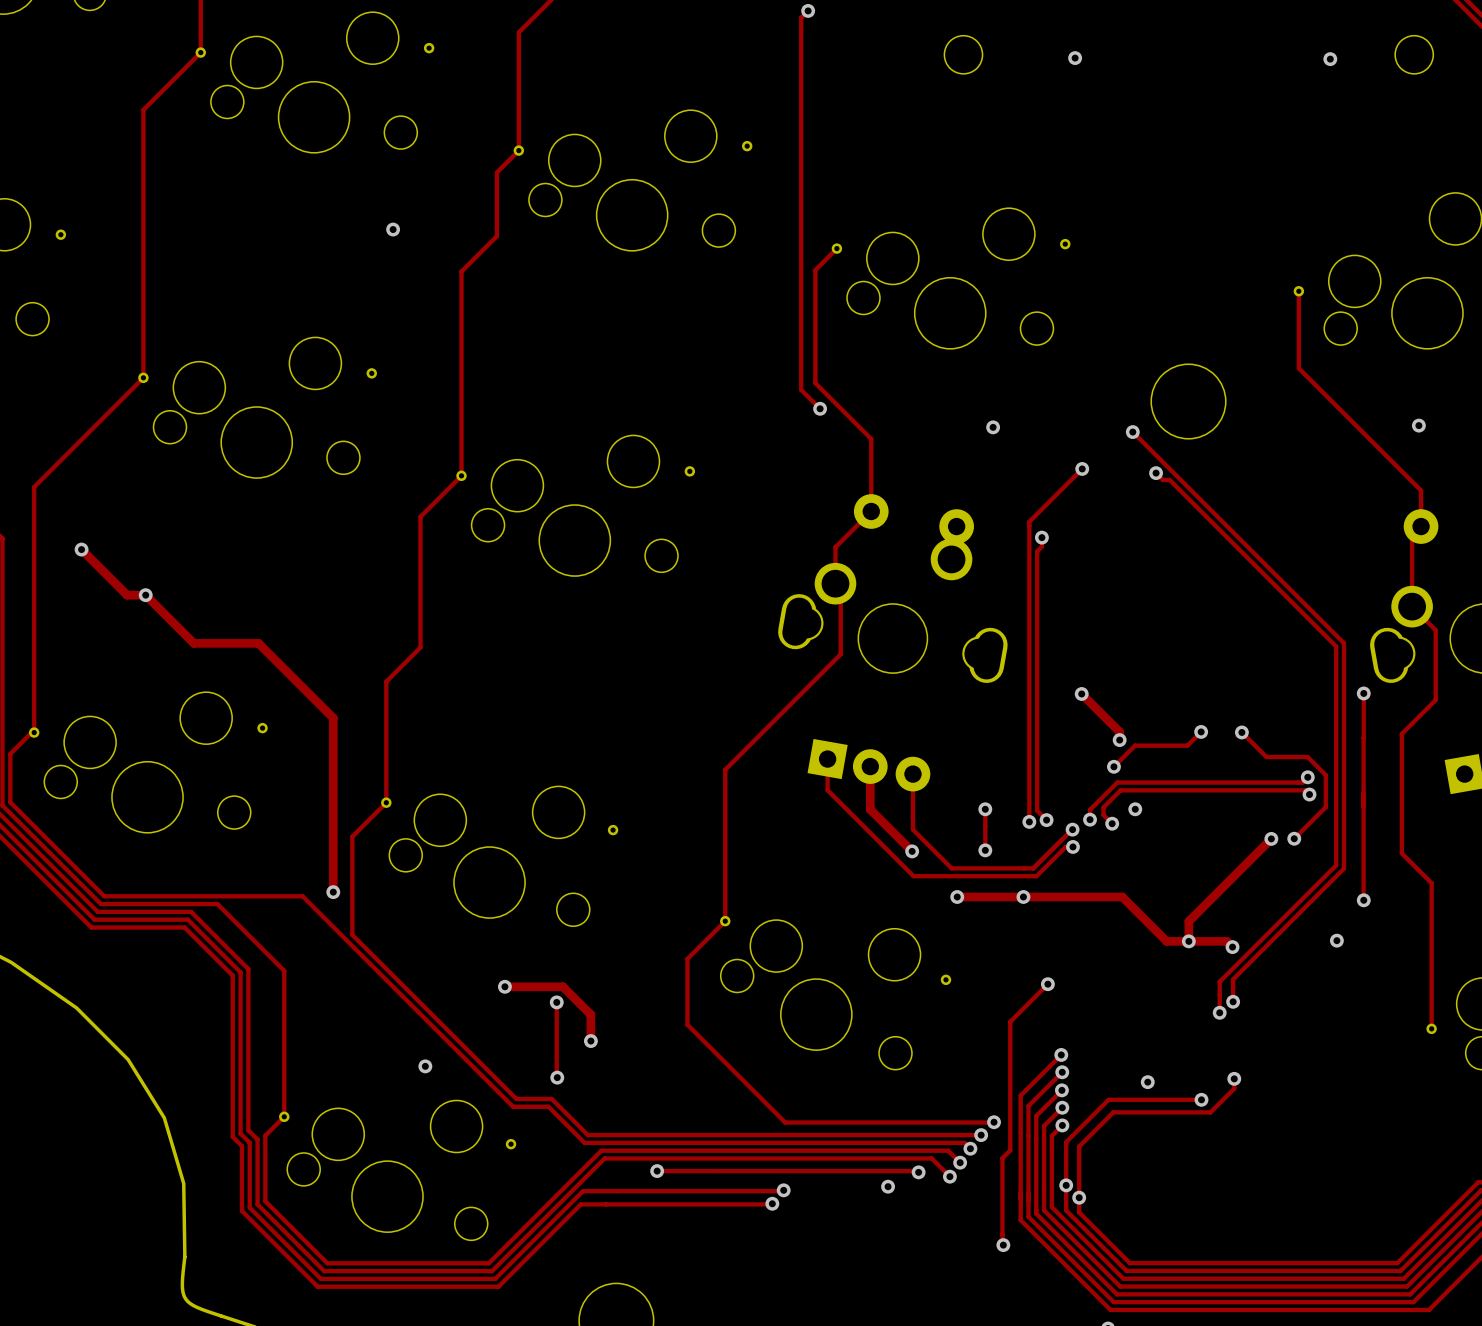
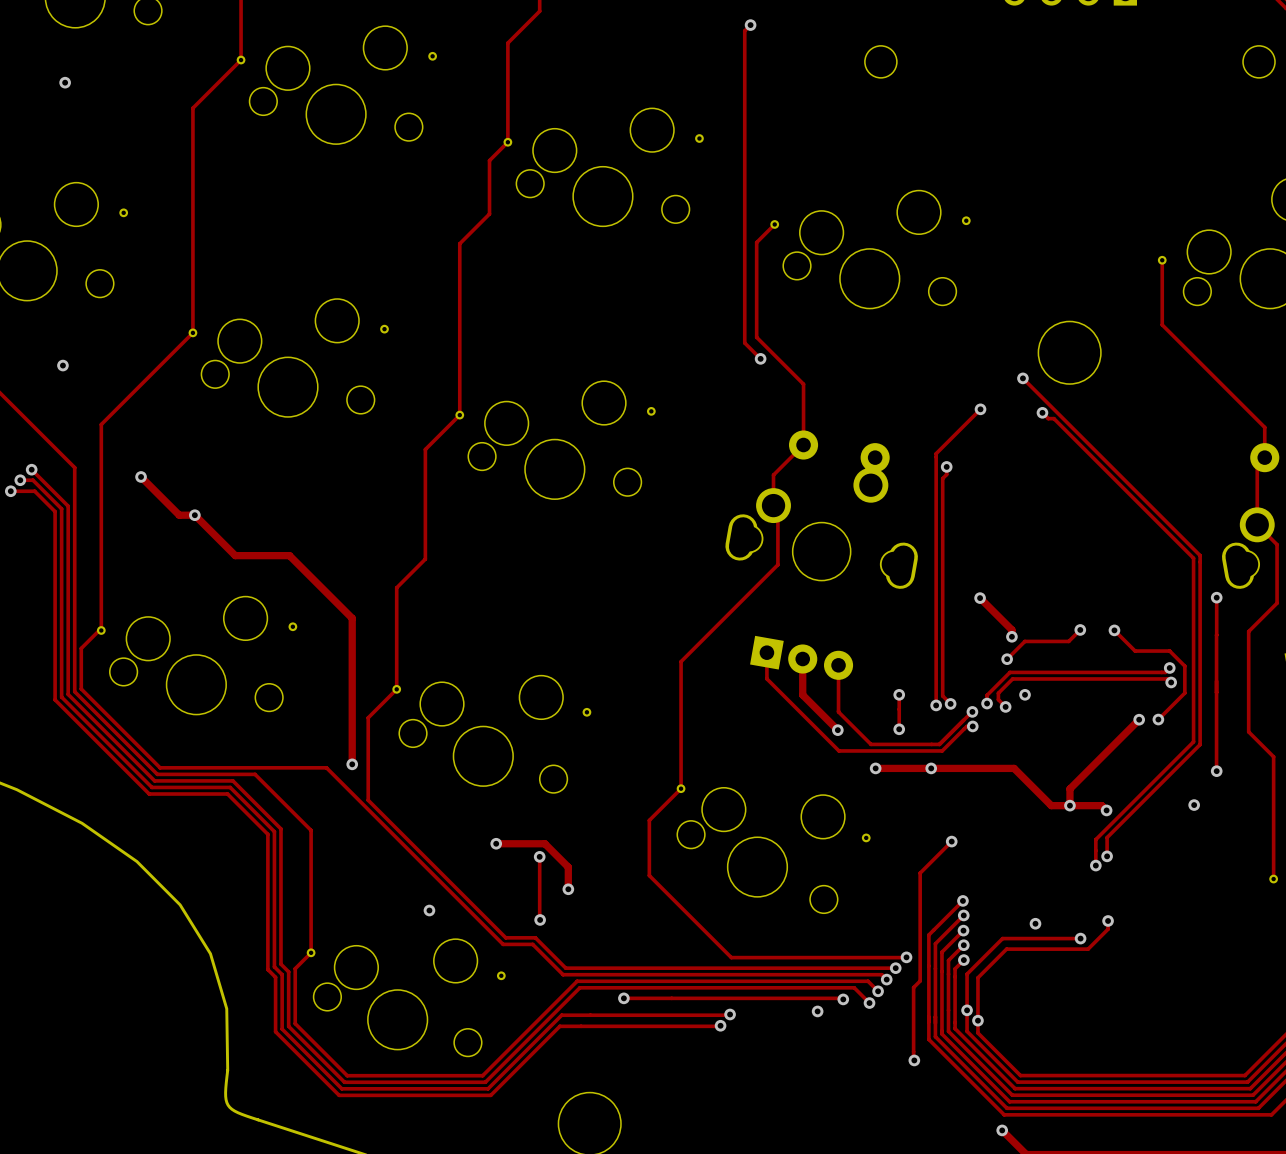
via: (1075, 58) -> none
via: (1330, 59) -> none
via: (393, 229) -> none
via: (1418, 425) -> none
via: (993, 427) -> none

